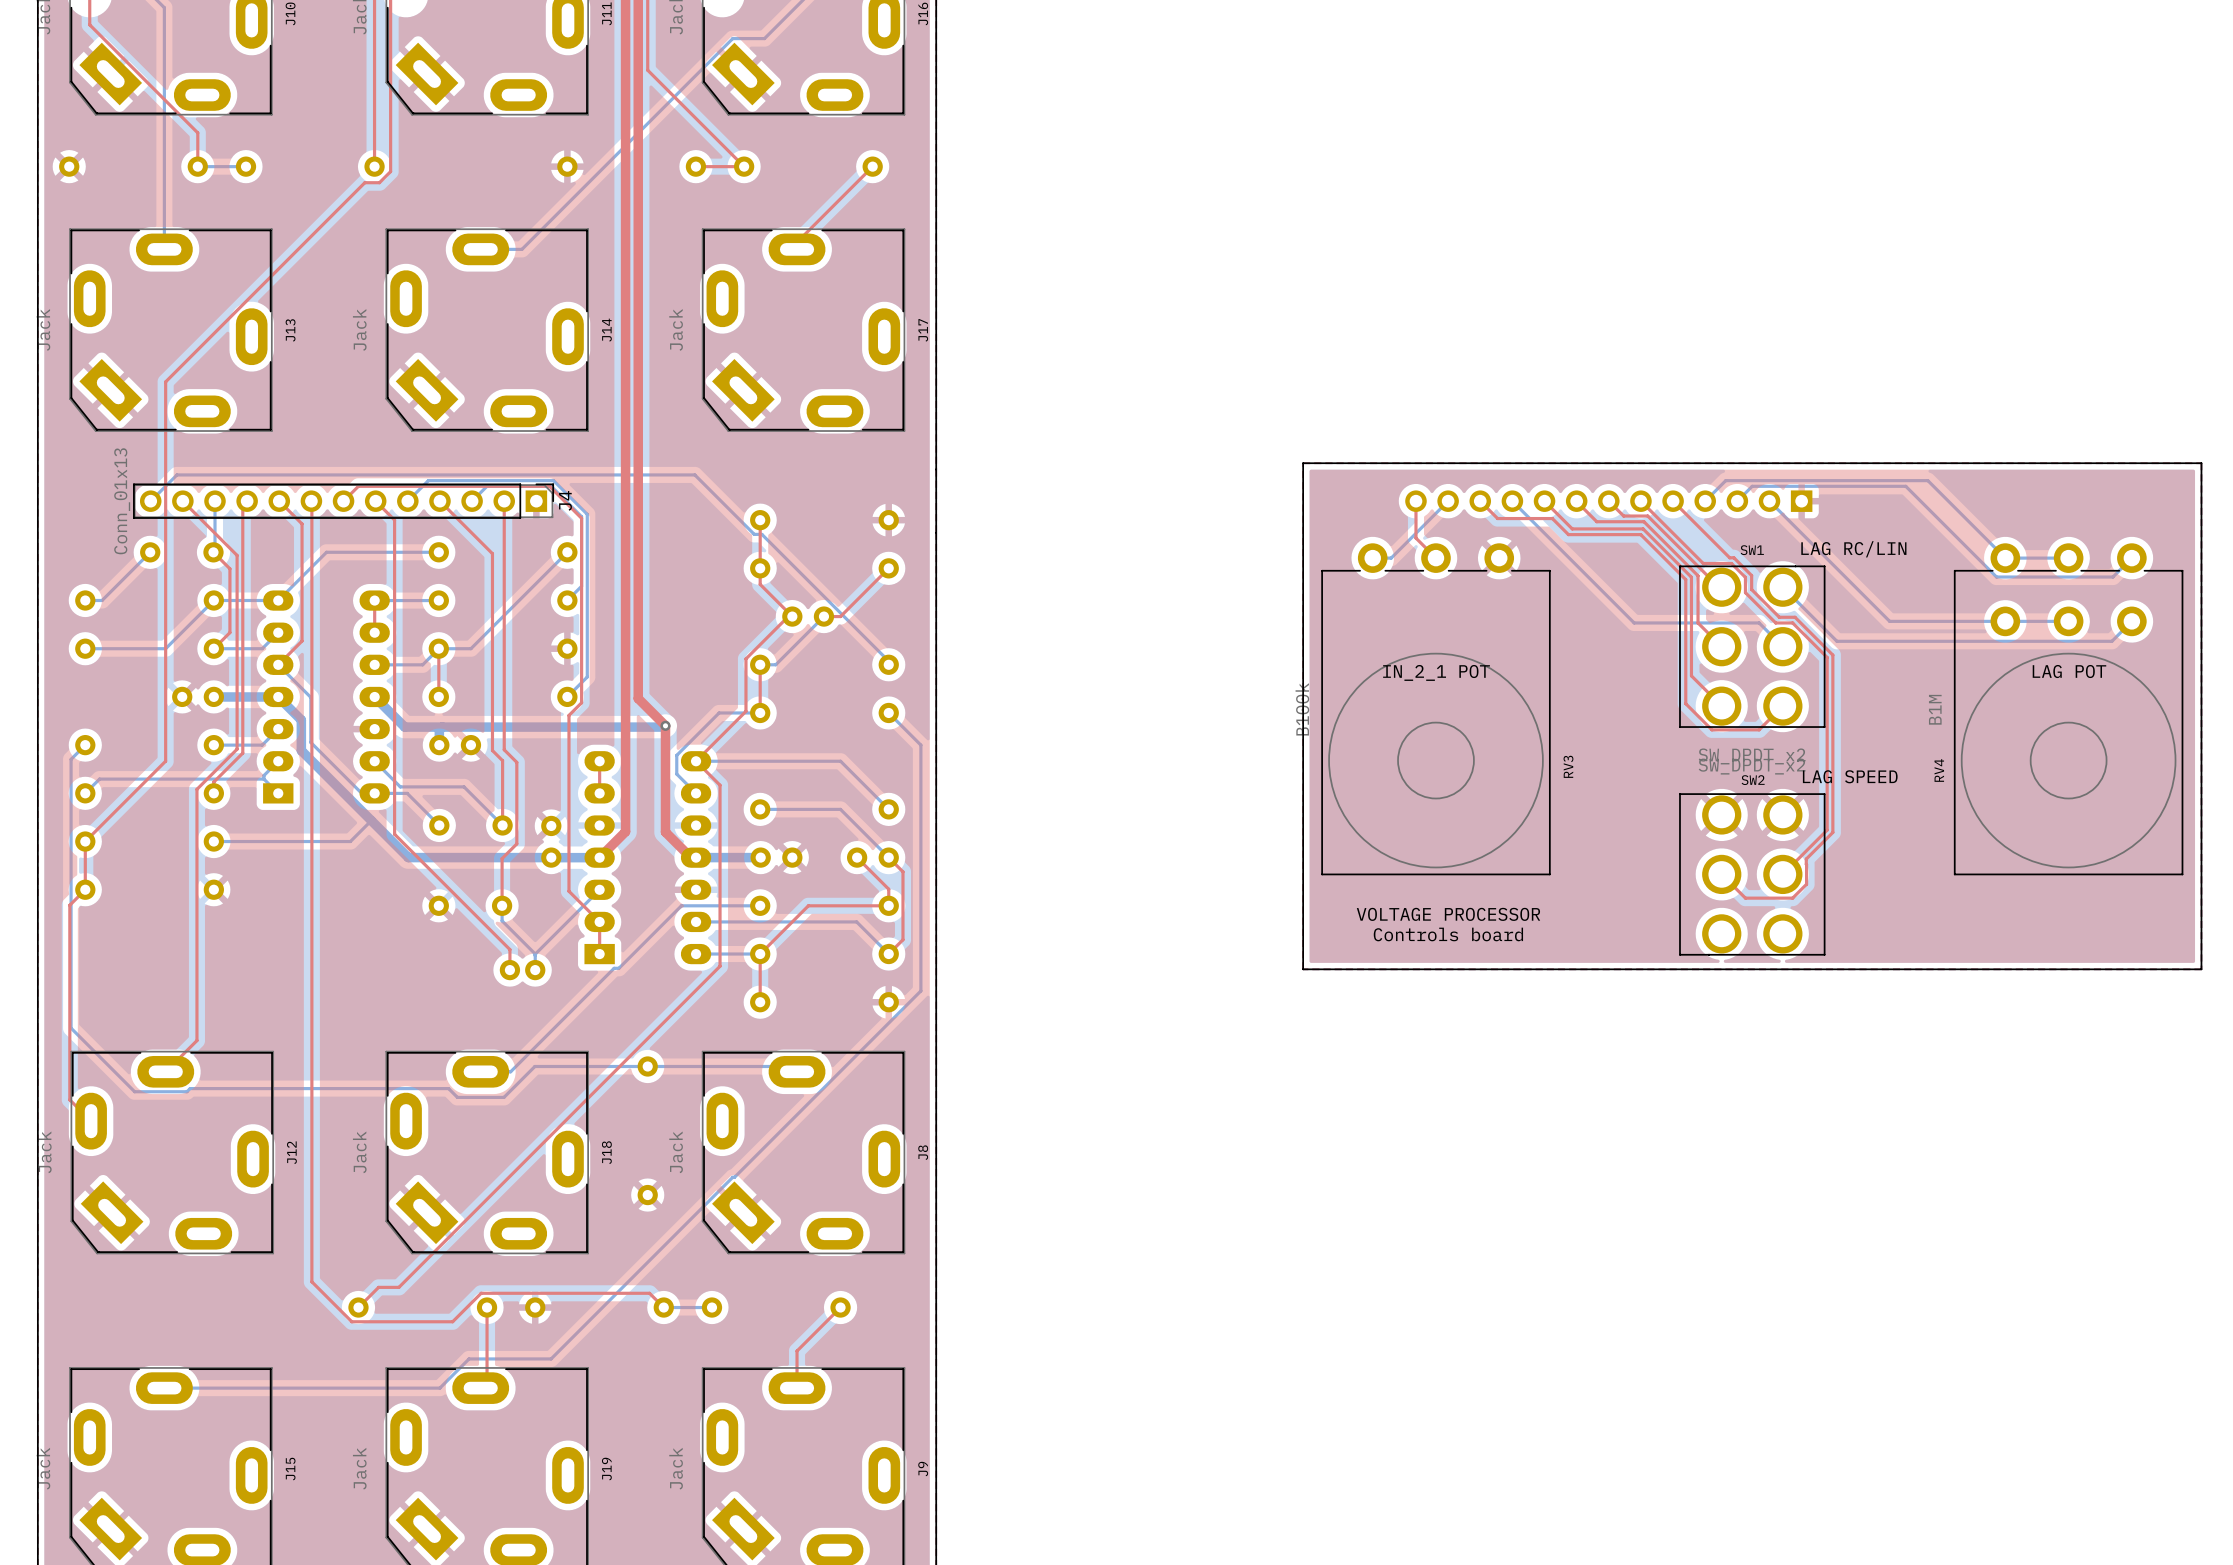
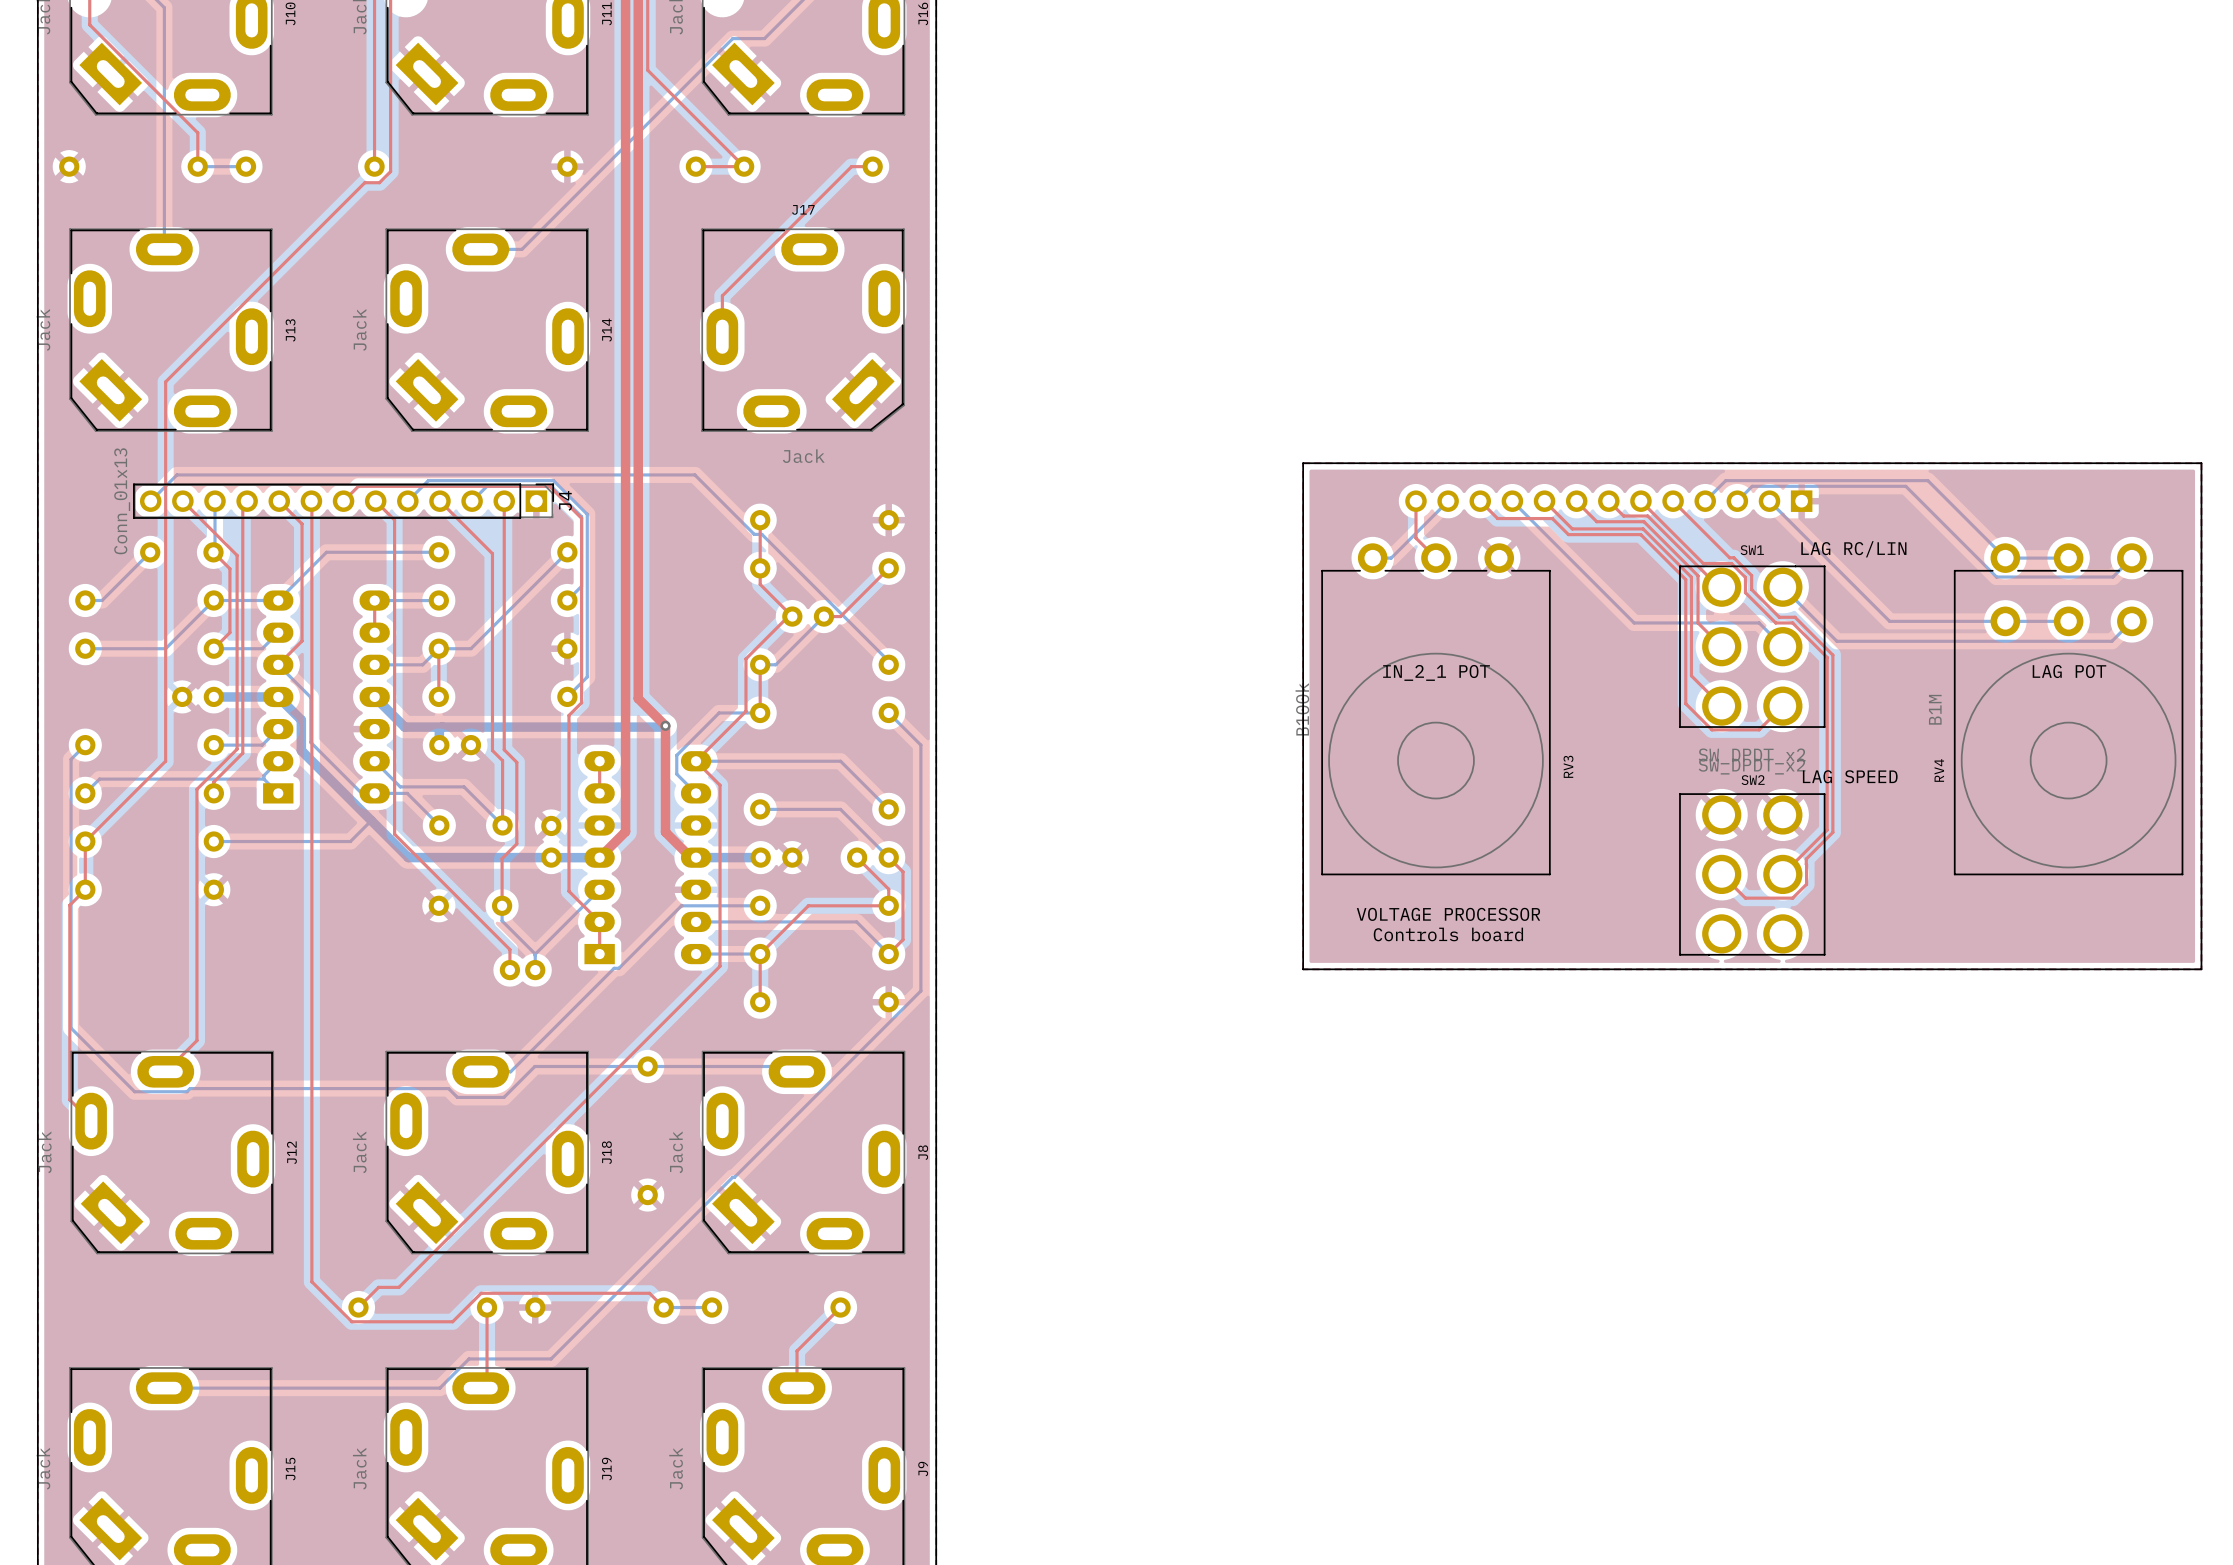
top track: (872, 166) (797, 242) (797, 249) -> (872, 166) (851, 166) (722, 295) (722, 336)
J17 rotation: 0° (803, 330) -> 90° counterclockwise (803, 330)

